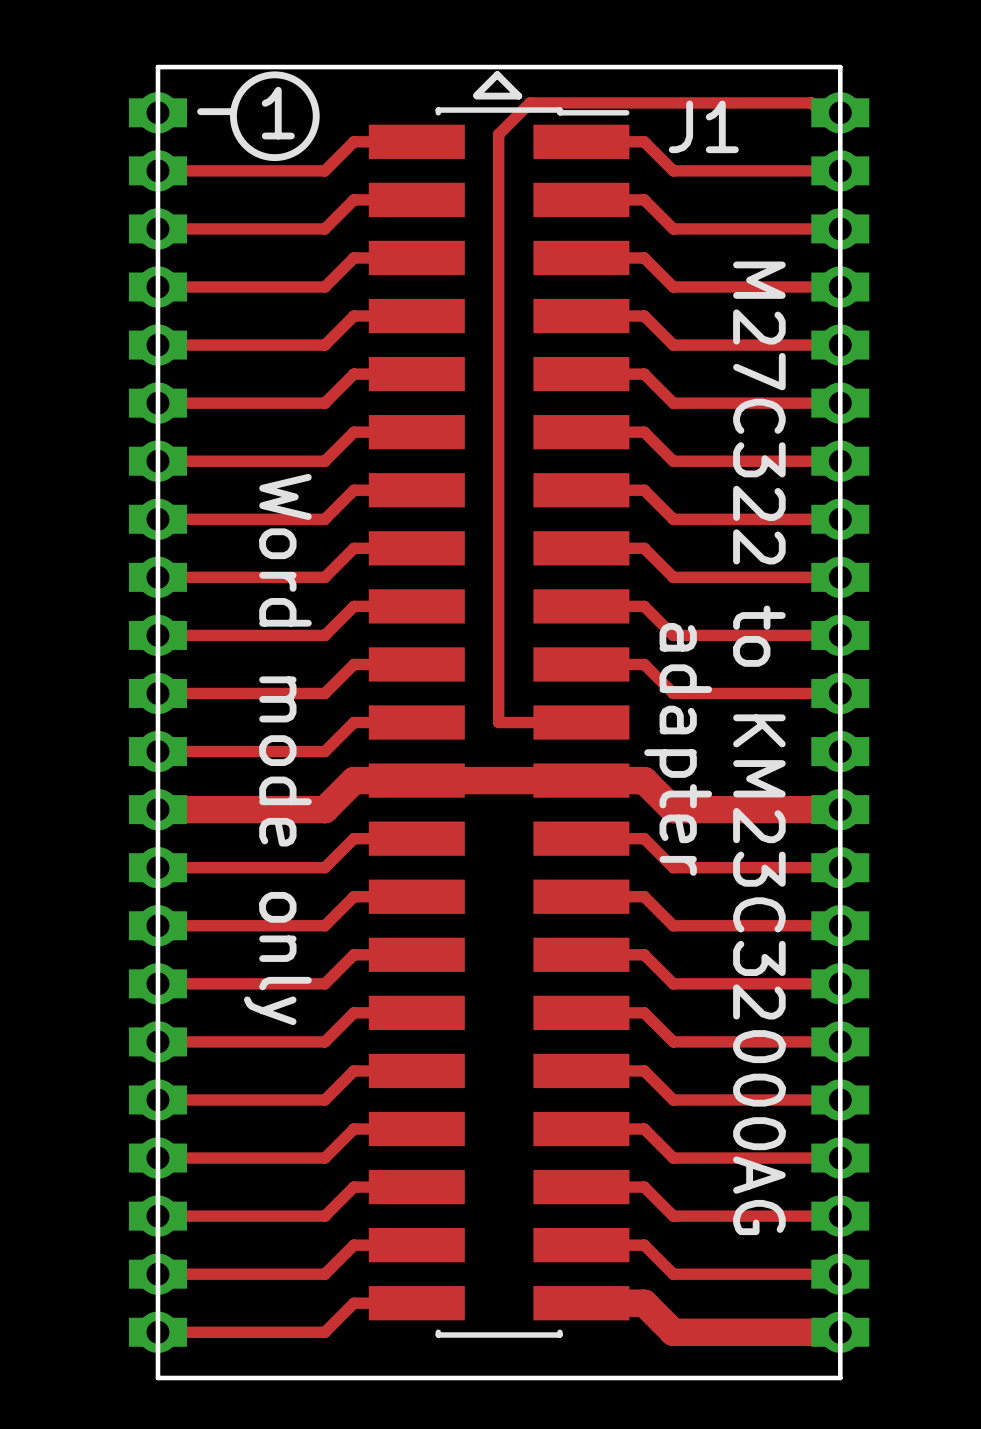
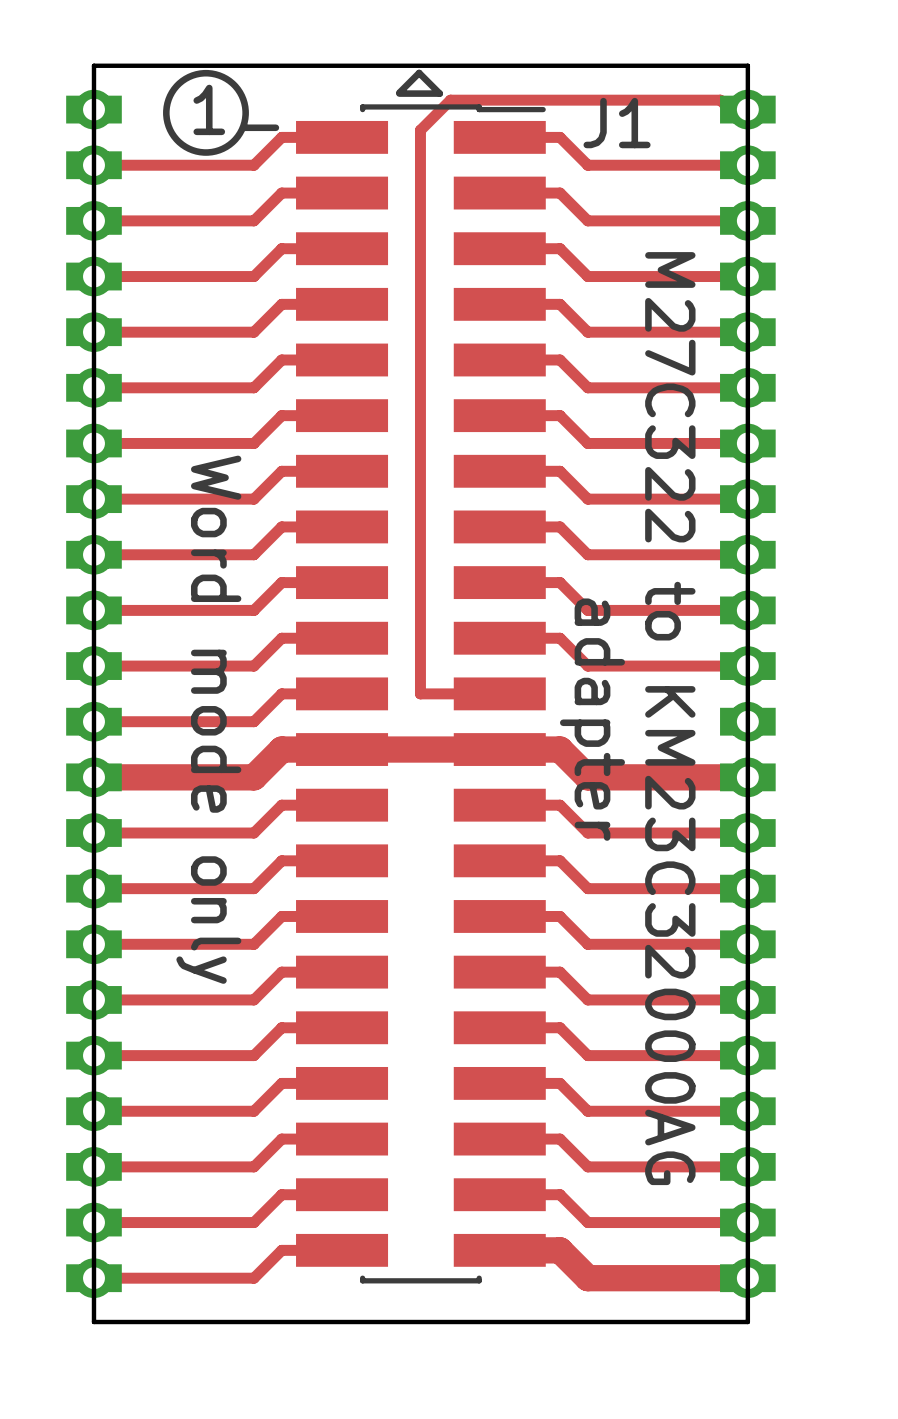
line: (200, 111) (233, 111) -> (244, 127) (275, 127)

